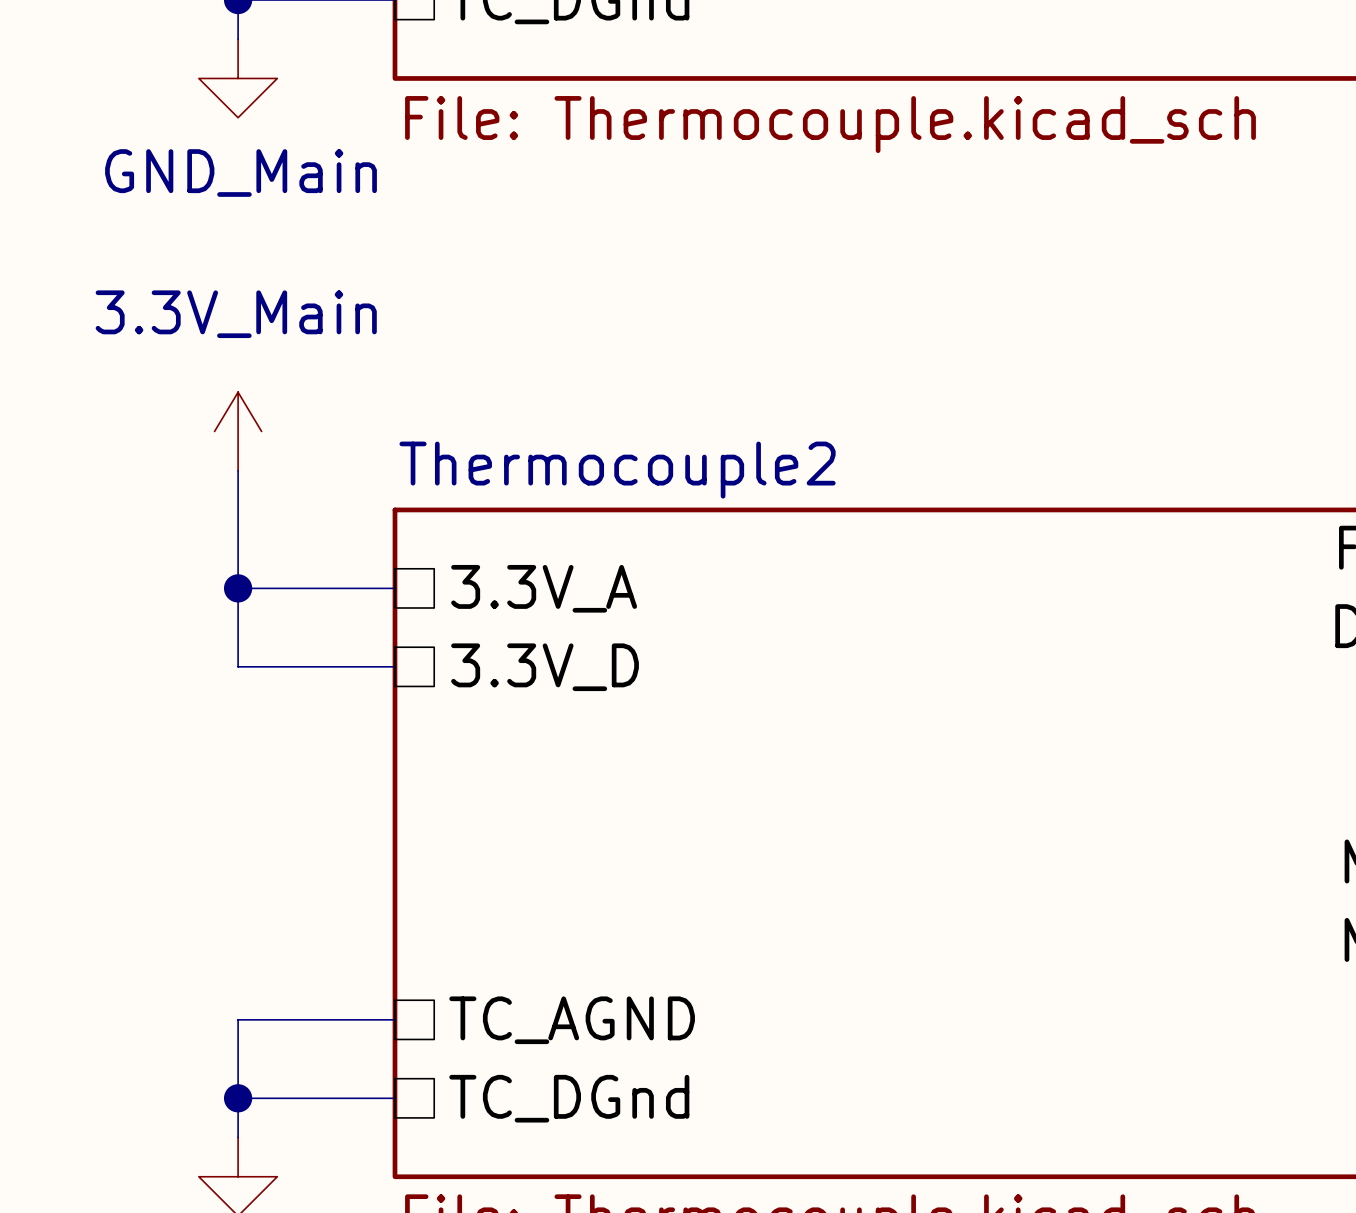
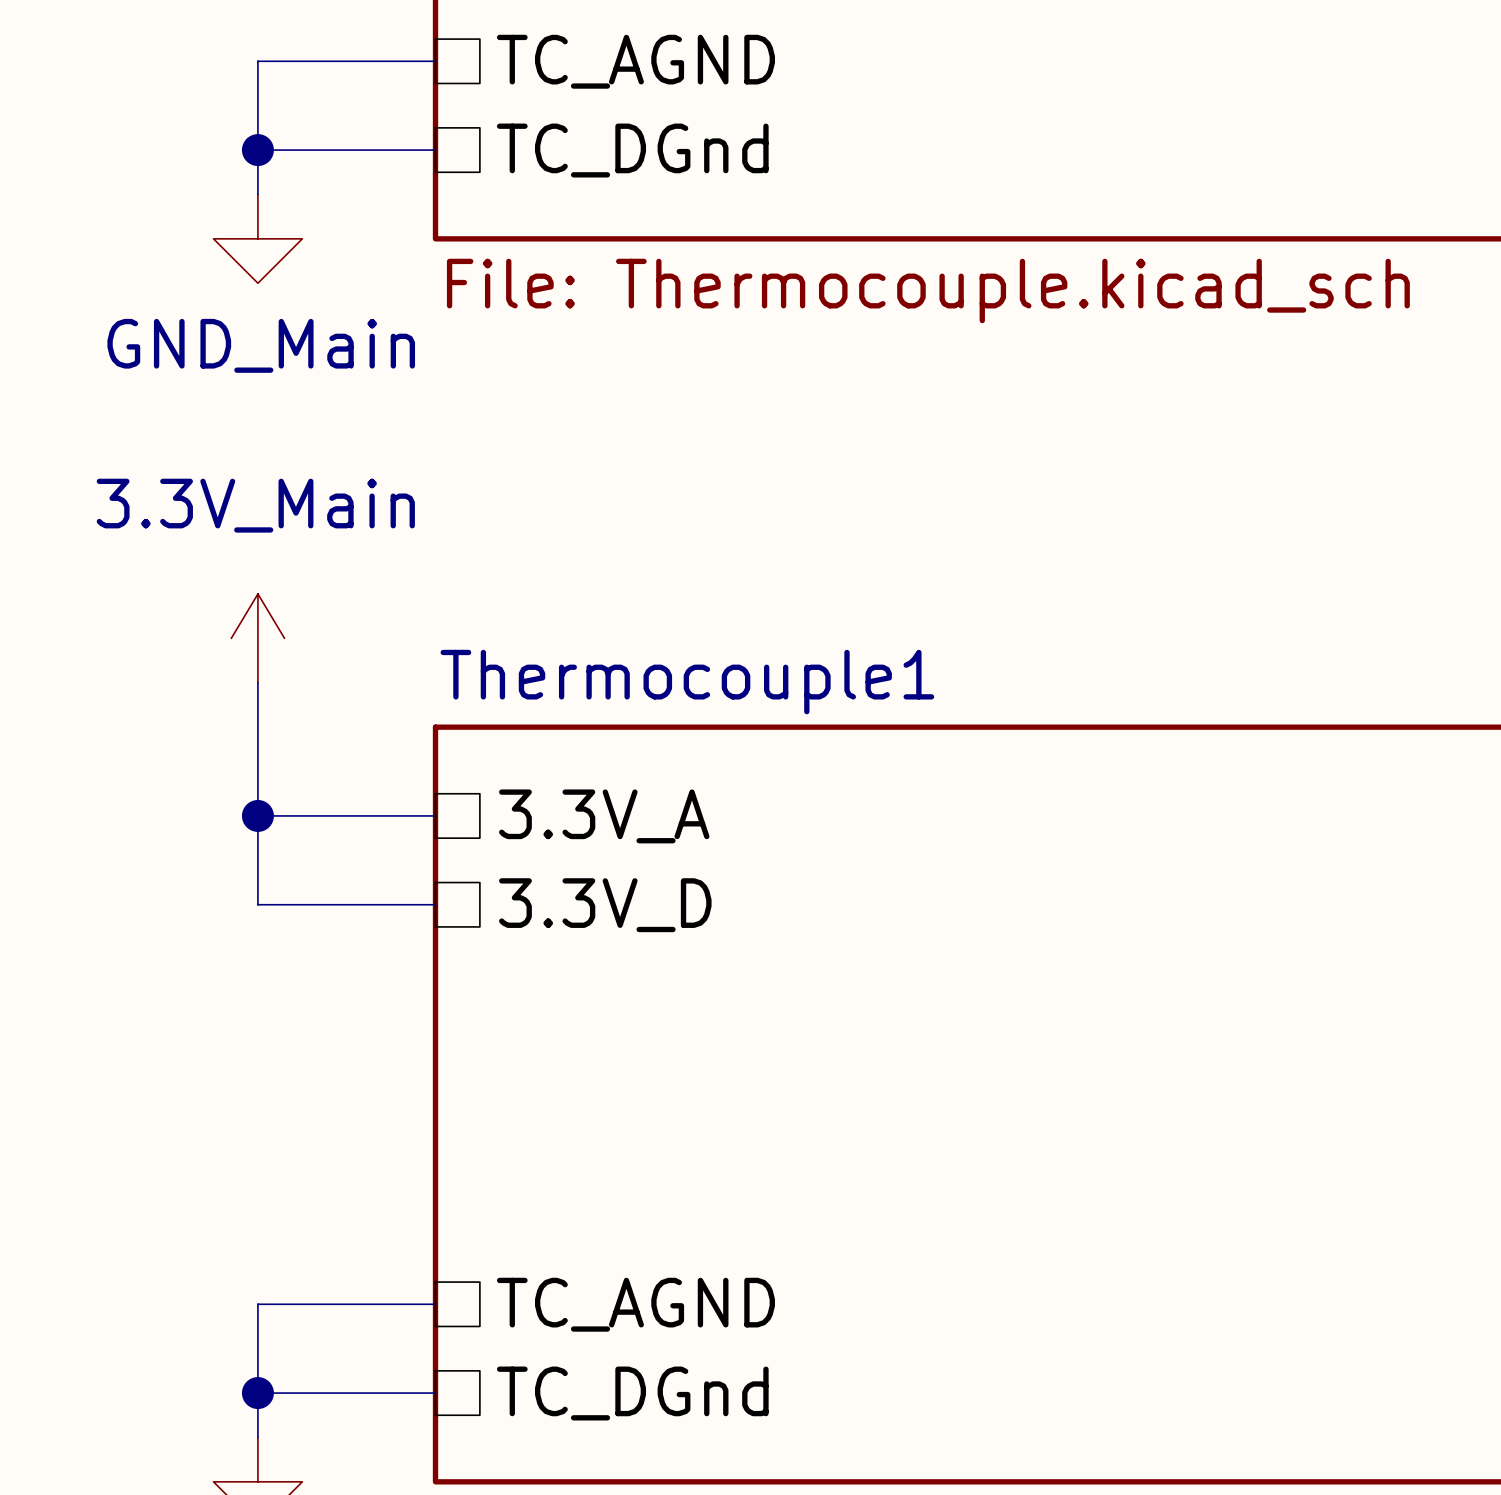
sheet Thermocouple2 name: Thermocouple2 (617, 470) -> Thermocouple1 (687, 682)

